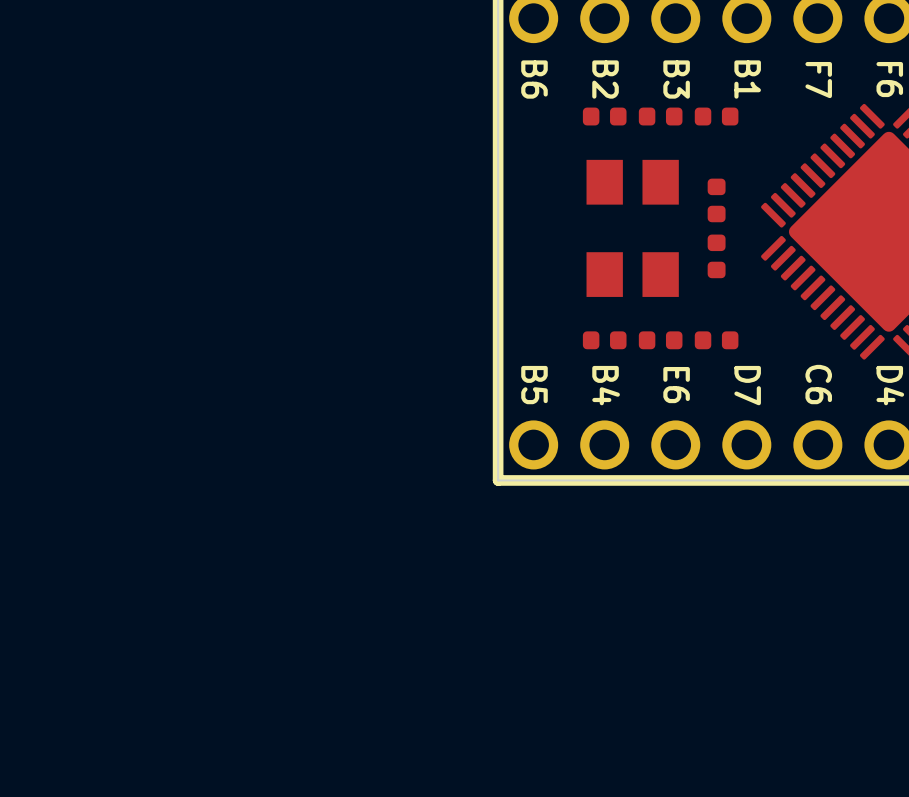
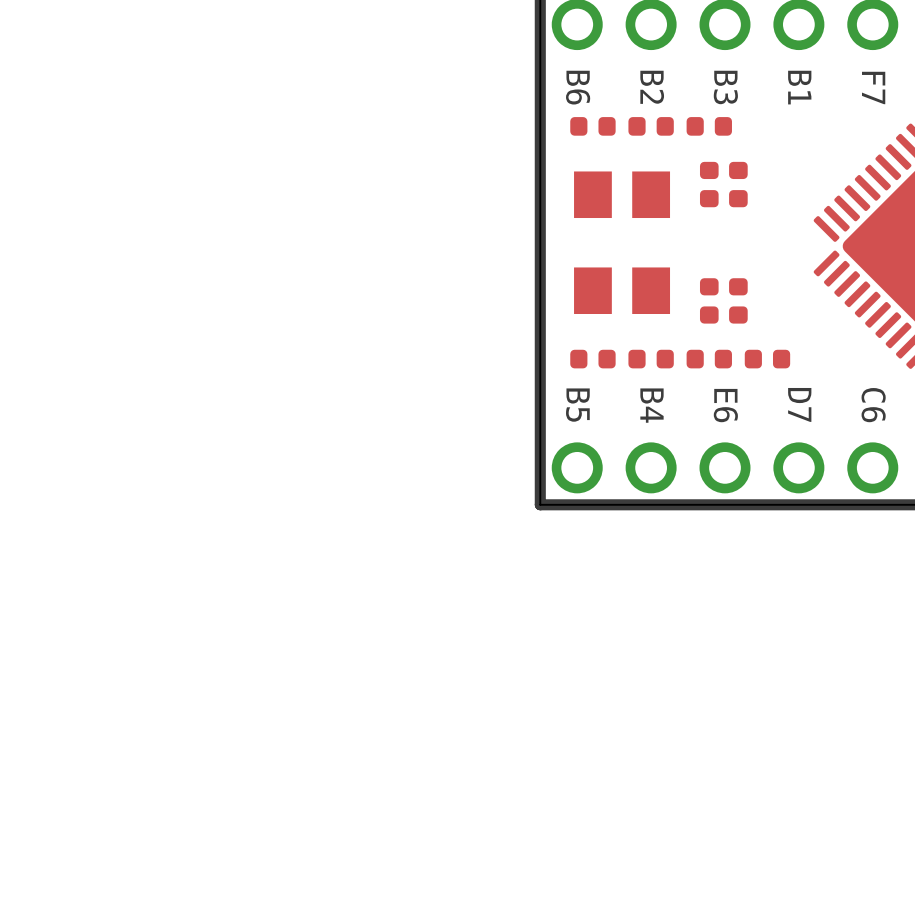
part: none -> (592, 126)
part: (716, 116) -> none
part: none -> (709, 184)
part: none -> (738, 184)
part: (716, 200) -> none
part position: (632, 228) -> (622, 242)
part: (716, 256) -> none
part: none -> (709, 300)
part: none -> (738, 300)
part: none -> (592, 359)

